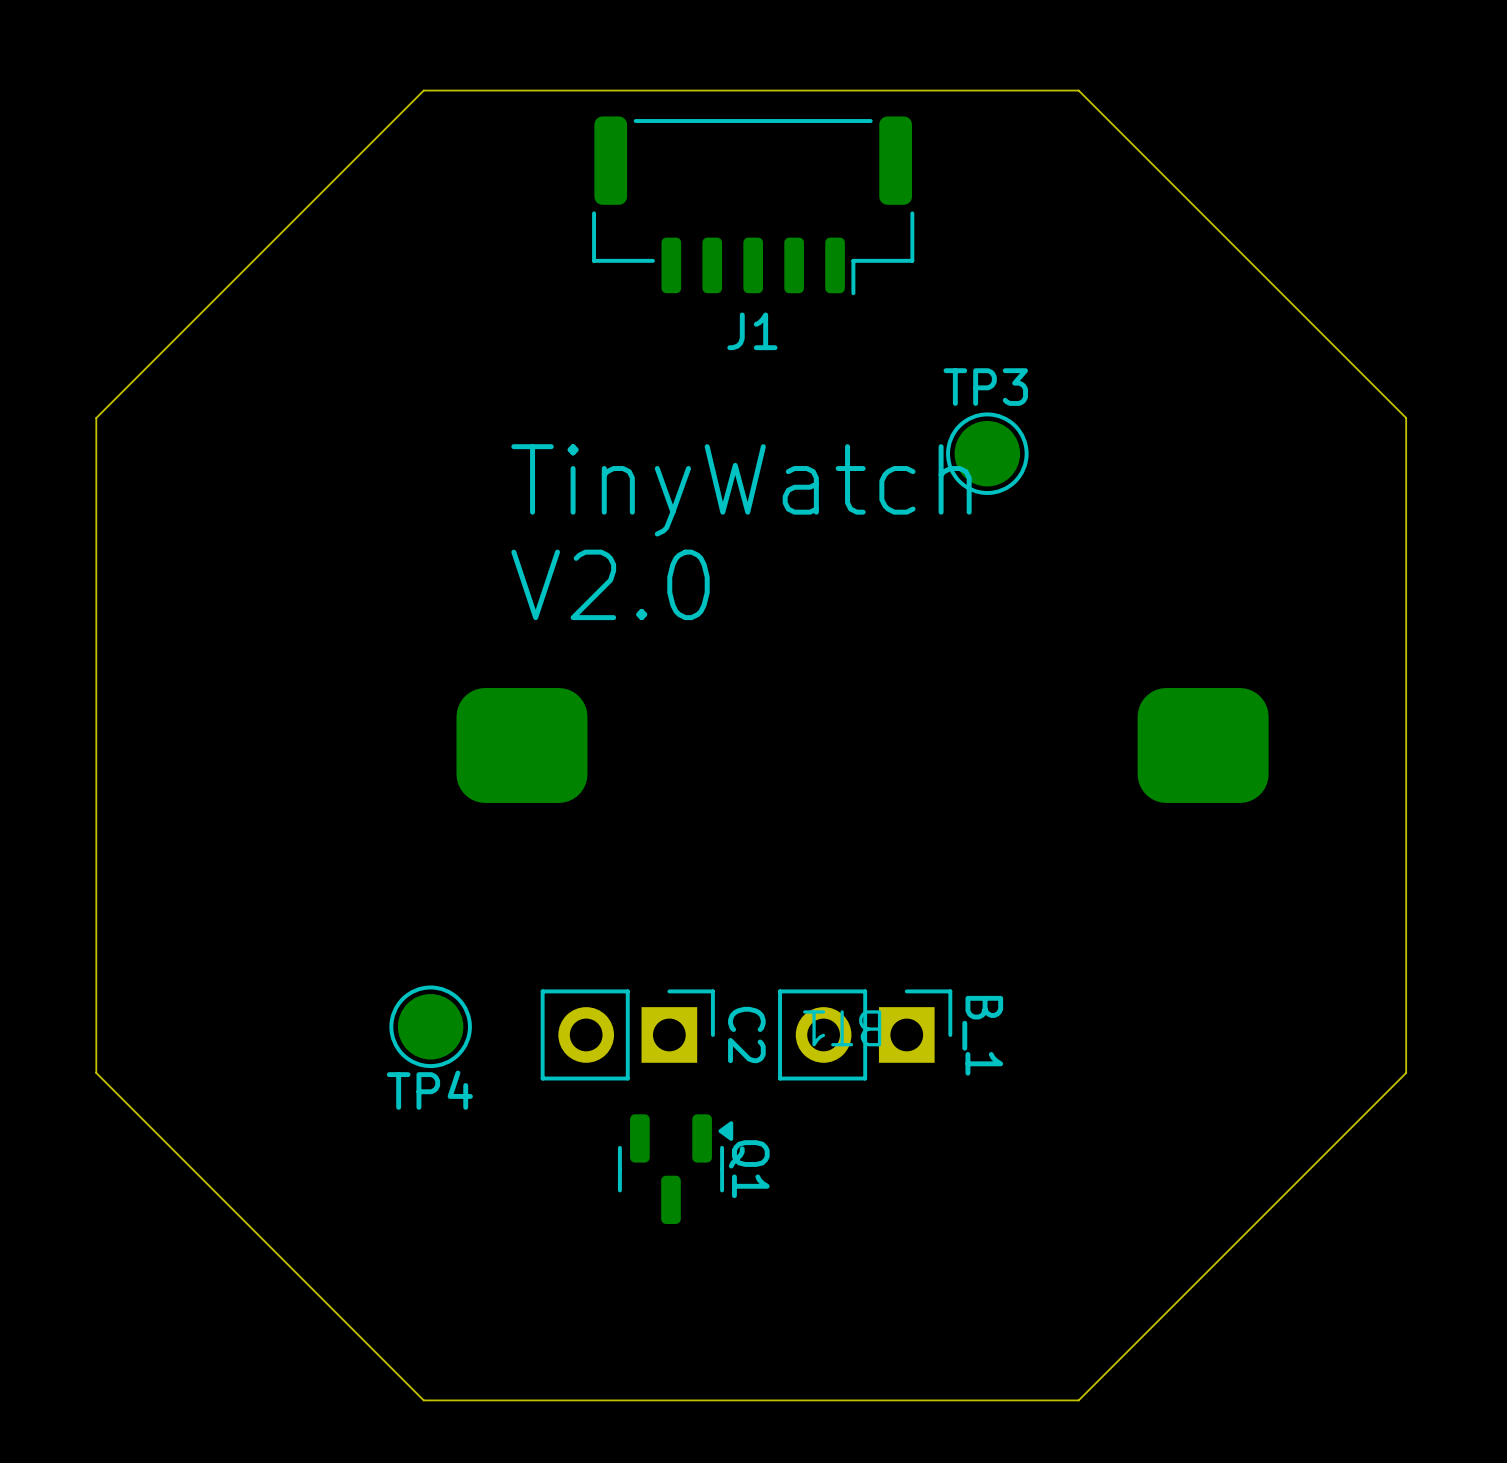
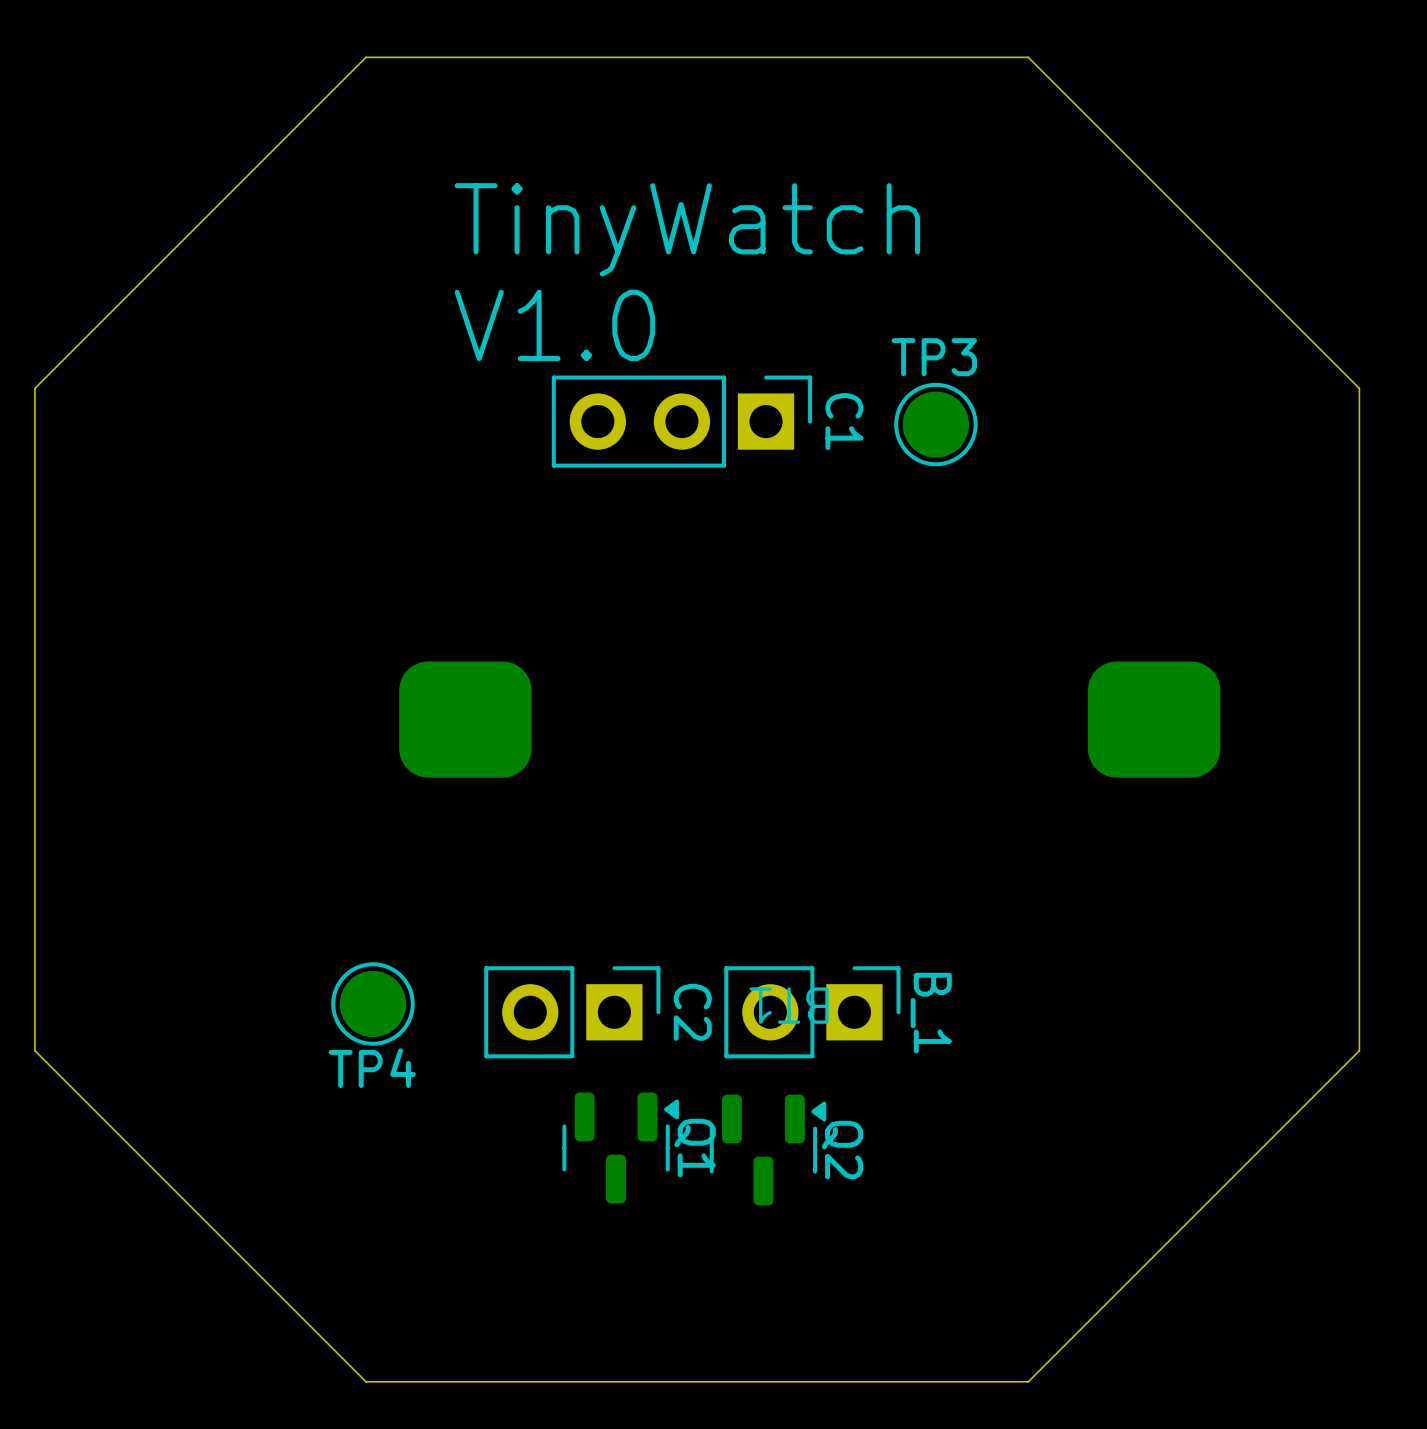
J1: (753, 205) -> none
text: none -> V1.0 (554, 325)
C1: none -> (681, 421)
text position: TinyWatch (741, 490) -> TinyWatch (687, 229)
text: V2.0 (610, 584) -> none
Q2: none -> (768, 1150)

